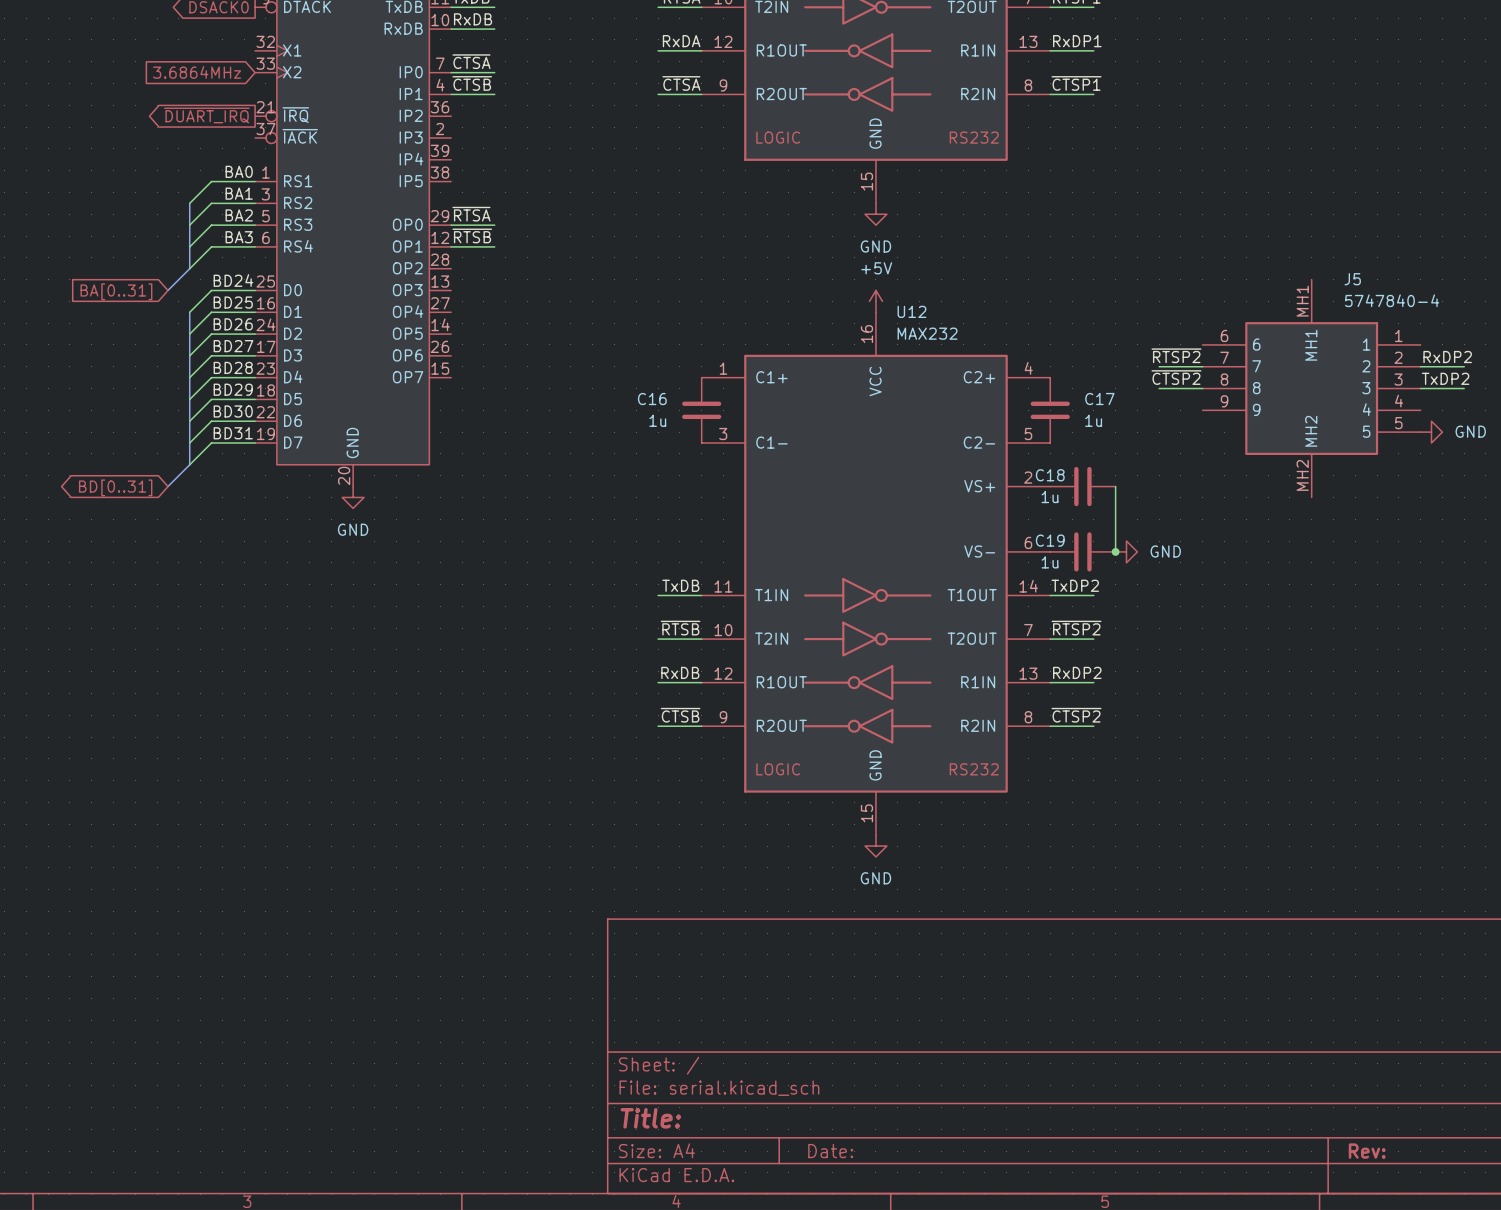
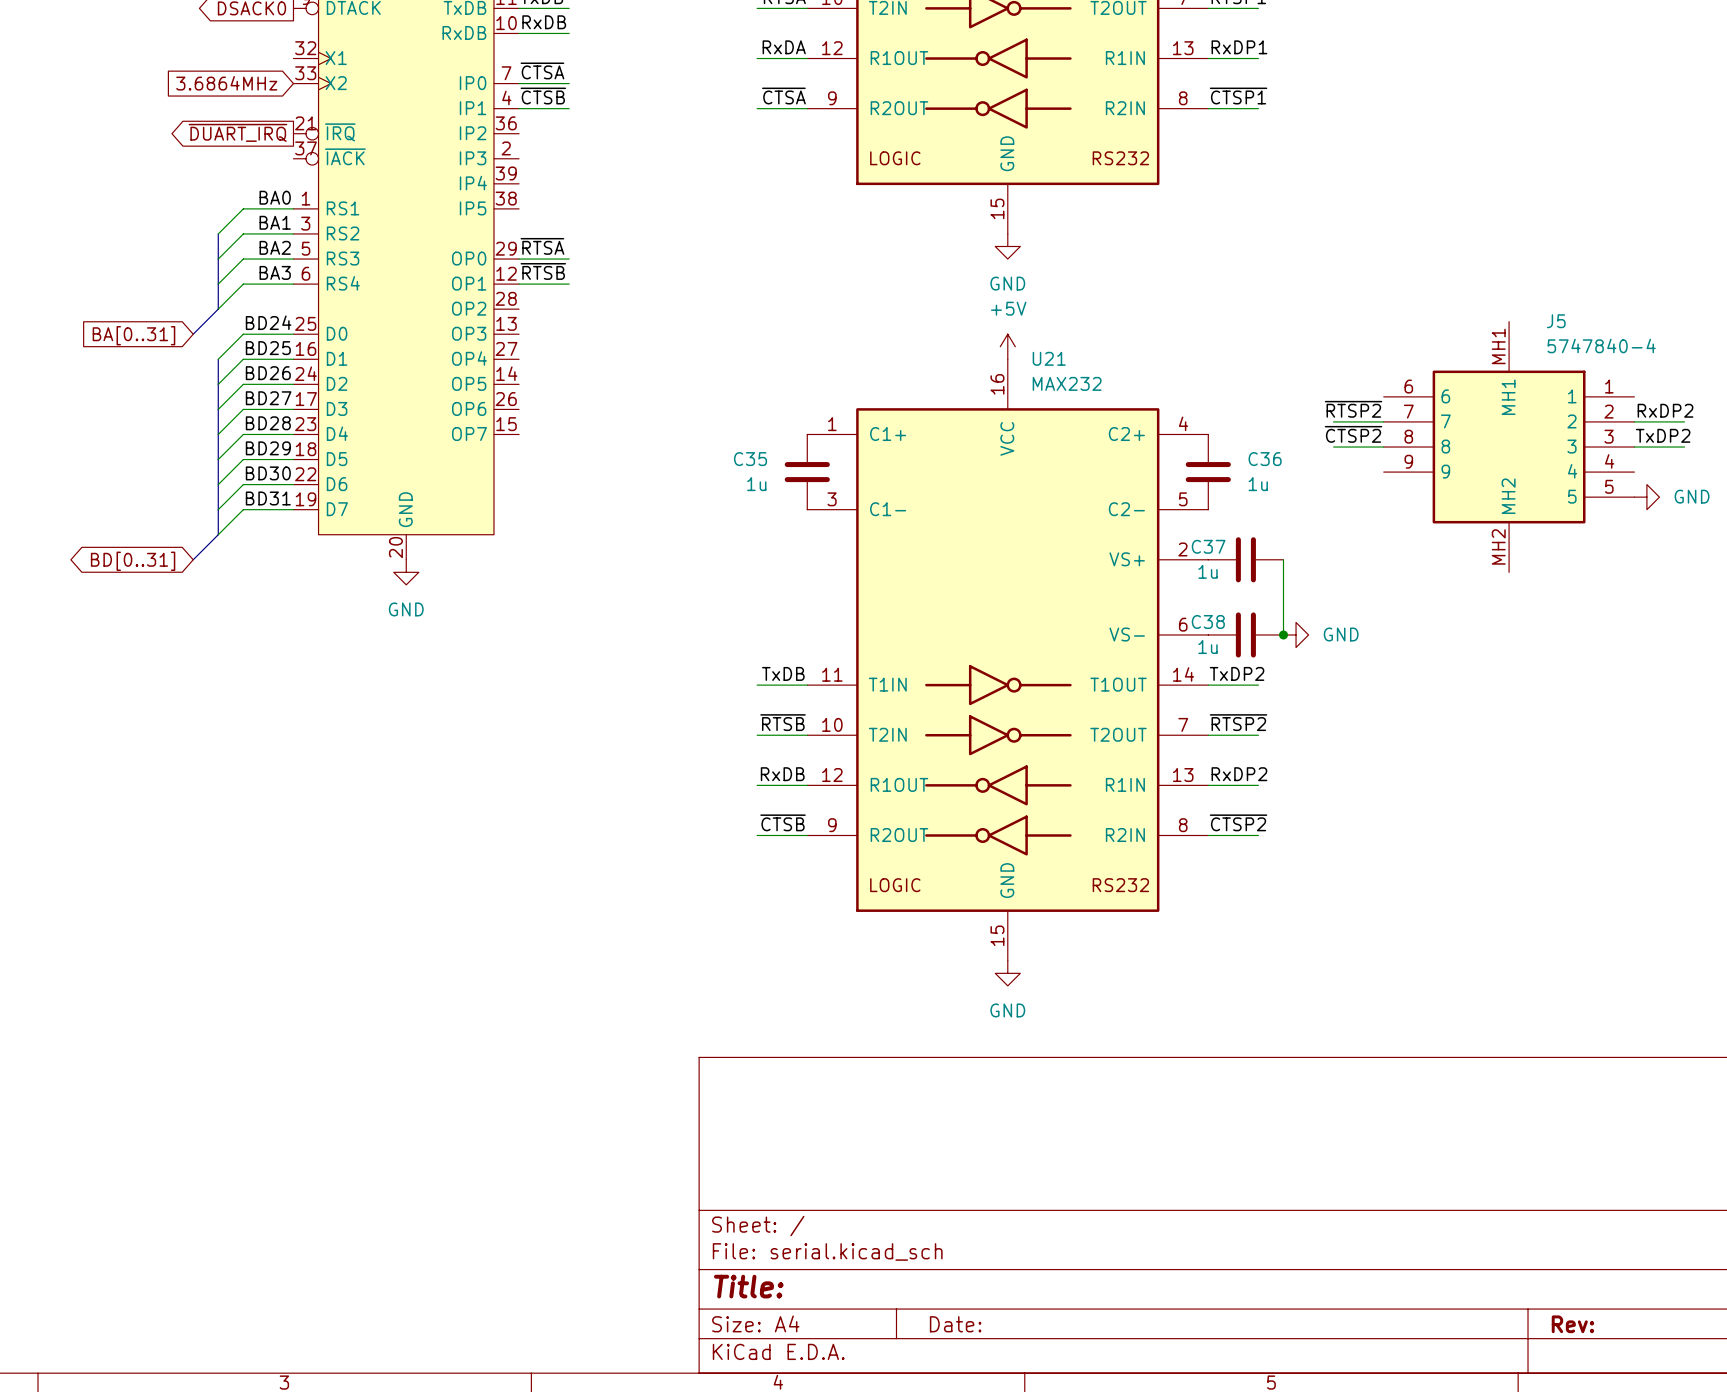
U12 name: U12 (911, 311) -> U21 (1049, 358)
C16 name: C16 (652, 399) -> C35 (750, 459)
C17 name: C17 (1099, 399) -> C36 (1265, 459)
C18 name: C18 (1050, 475) -> C37 (1208, 546)
C19 name: C19 (1050, 540) -> C38 (1208, 621)

